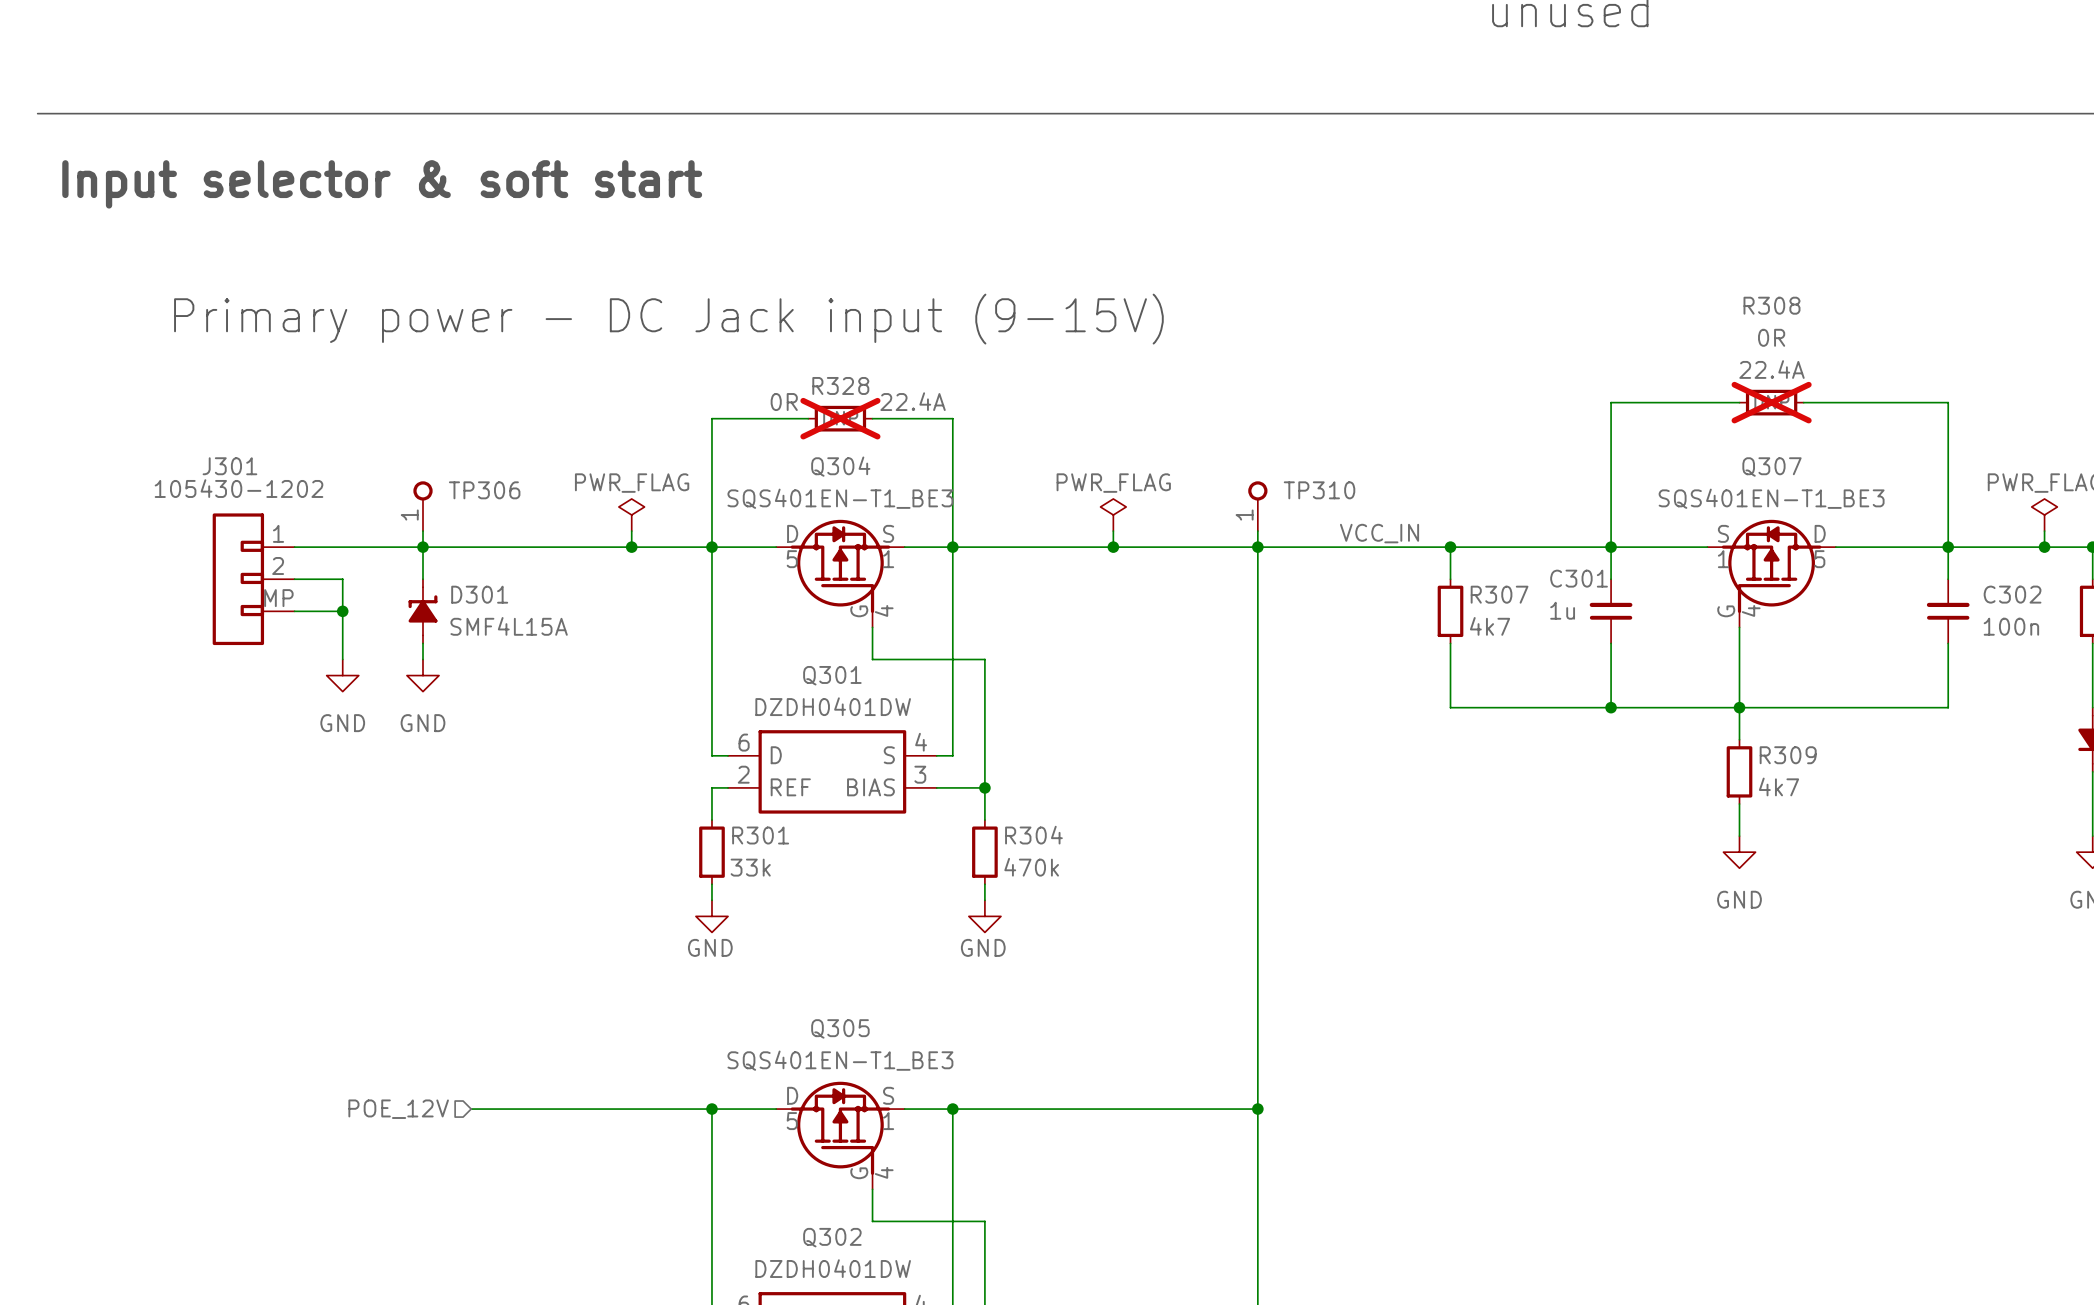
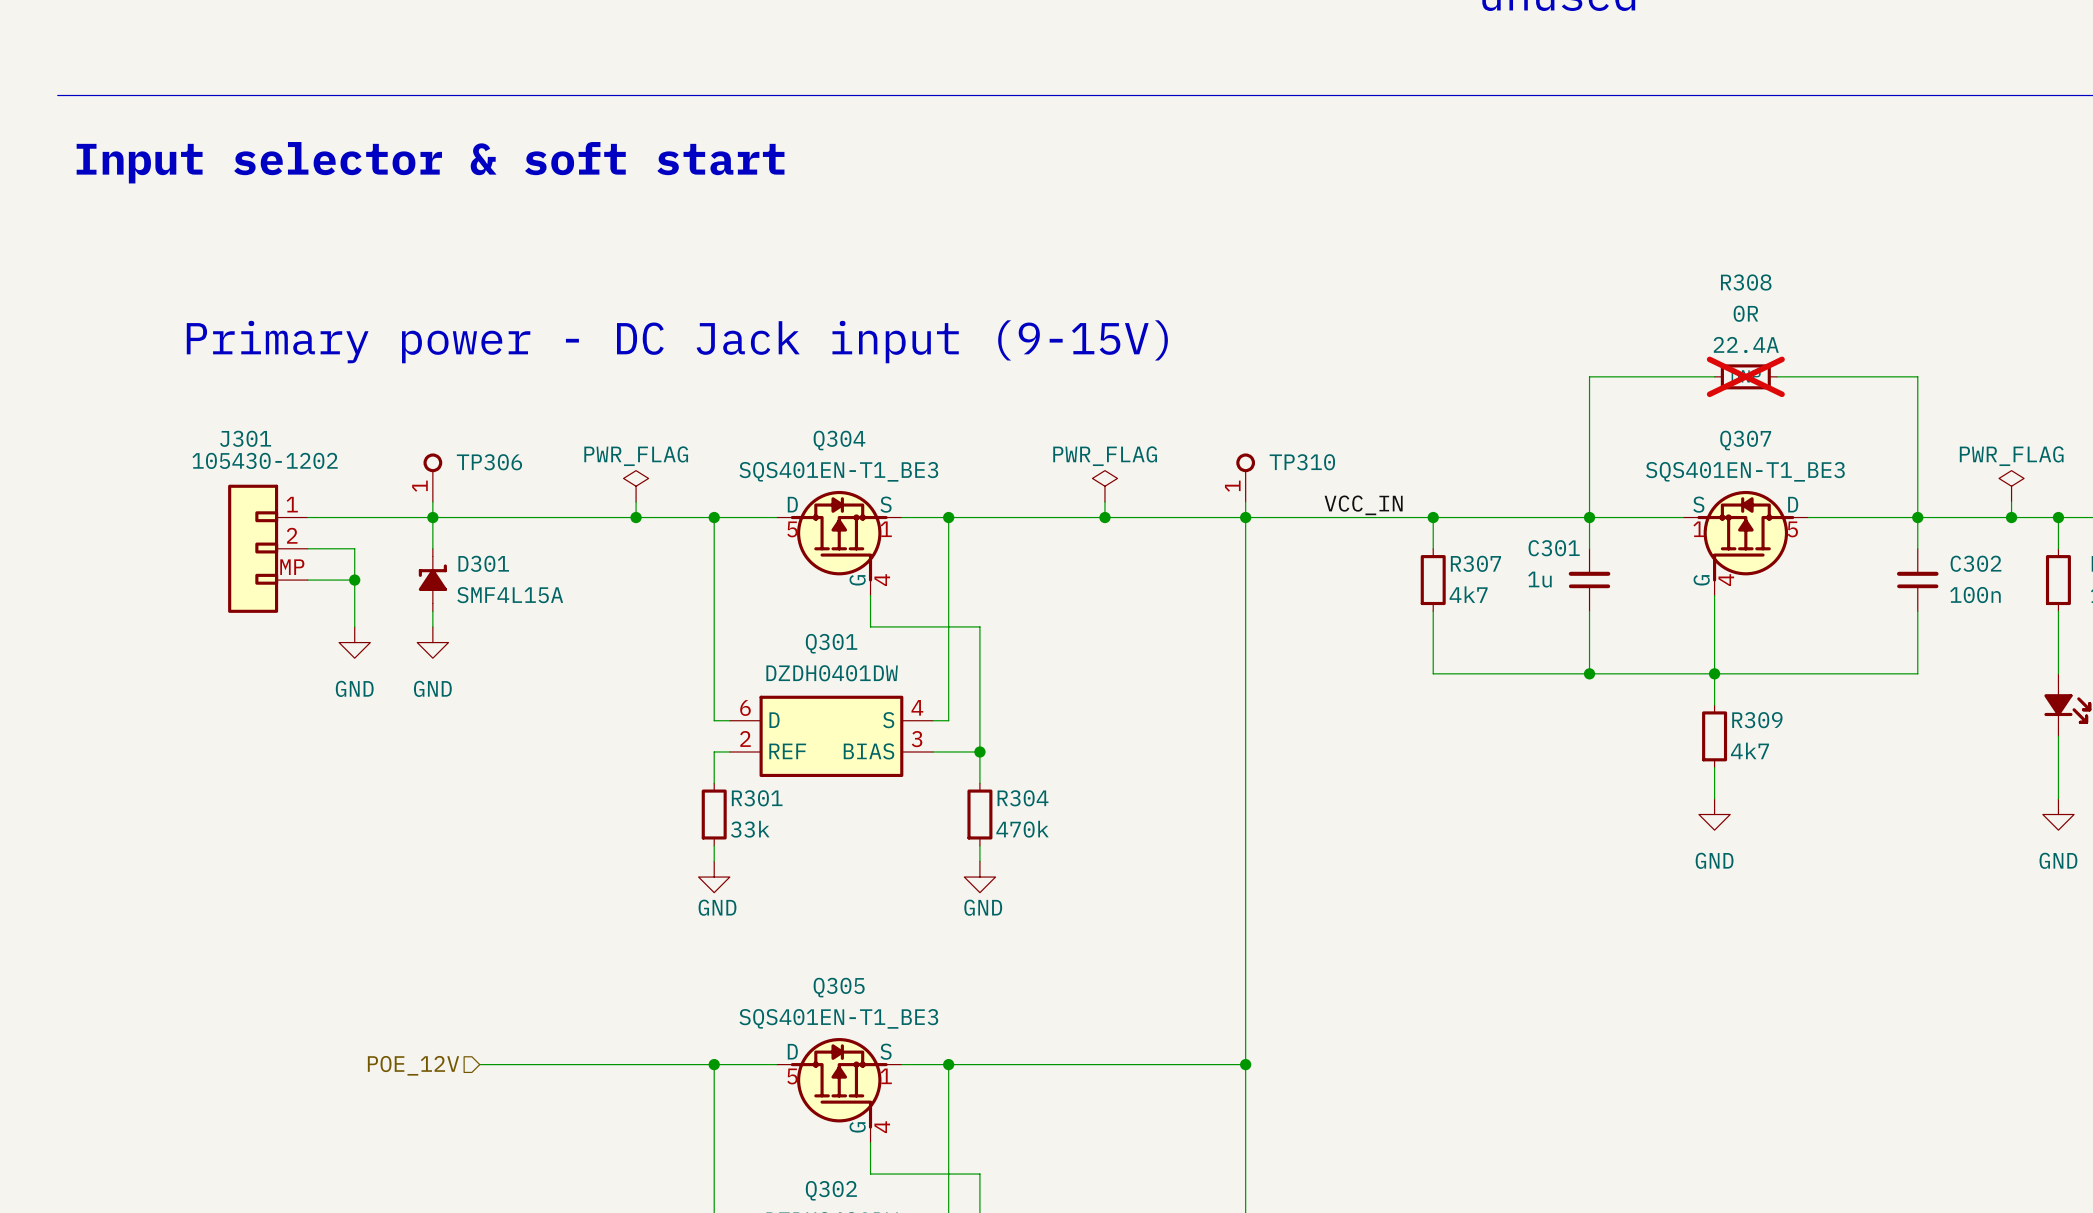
text position: Primary power - DC Jack input (9-15V) (668, 319) -> Primary power - DC Jack input (9-15V) (677, 341)
wire: (808, 418) (711, 418) (711, 547) -> none
R328: (840, 418) -> none
wire: (872, 418) (952, 418) (952, 547) -> none

